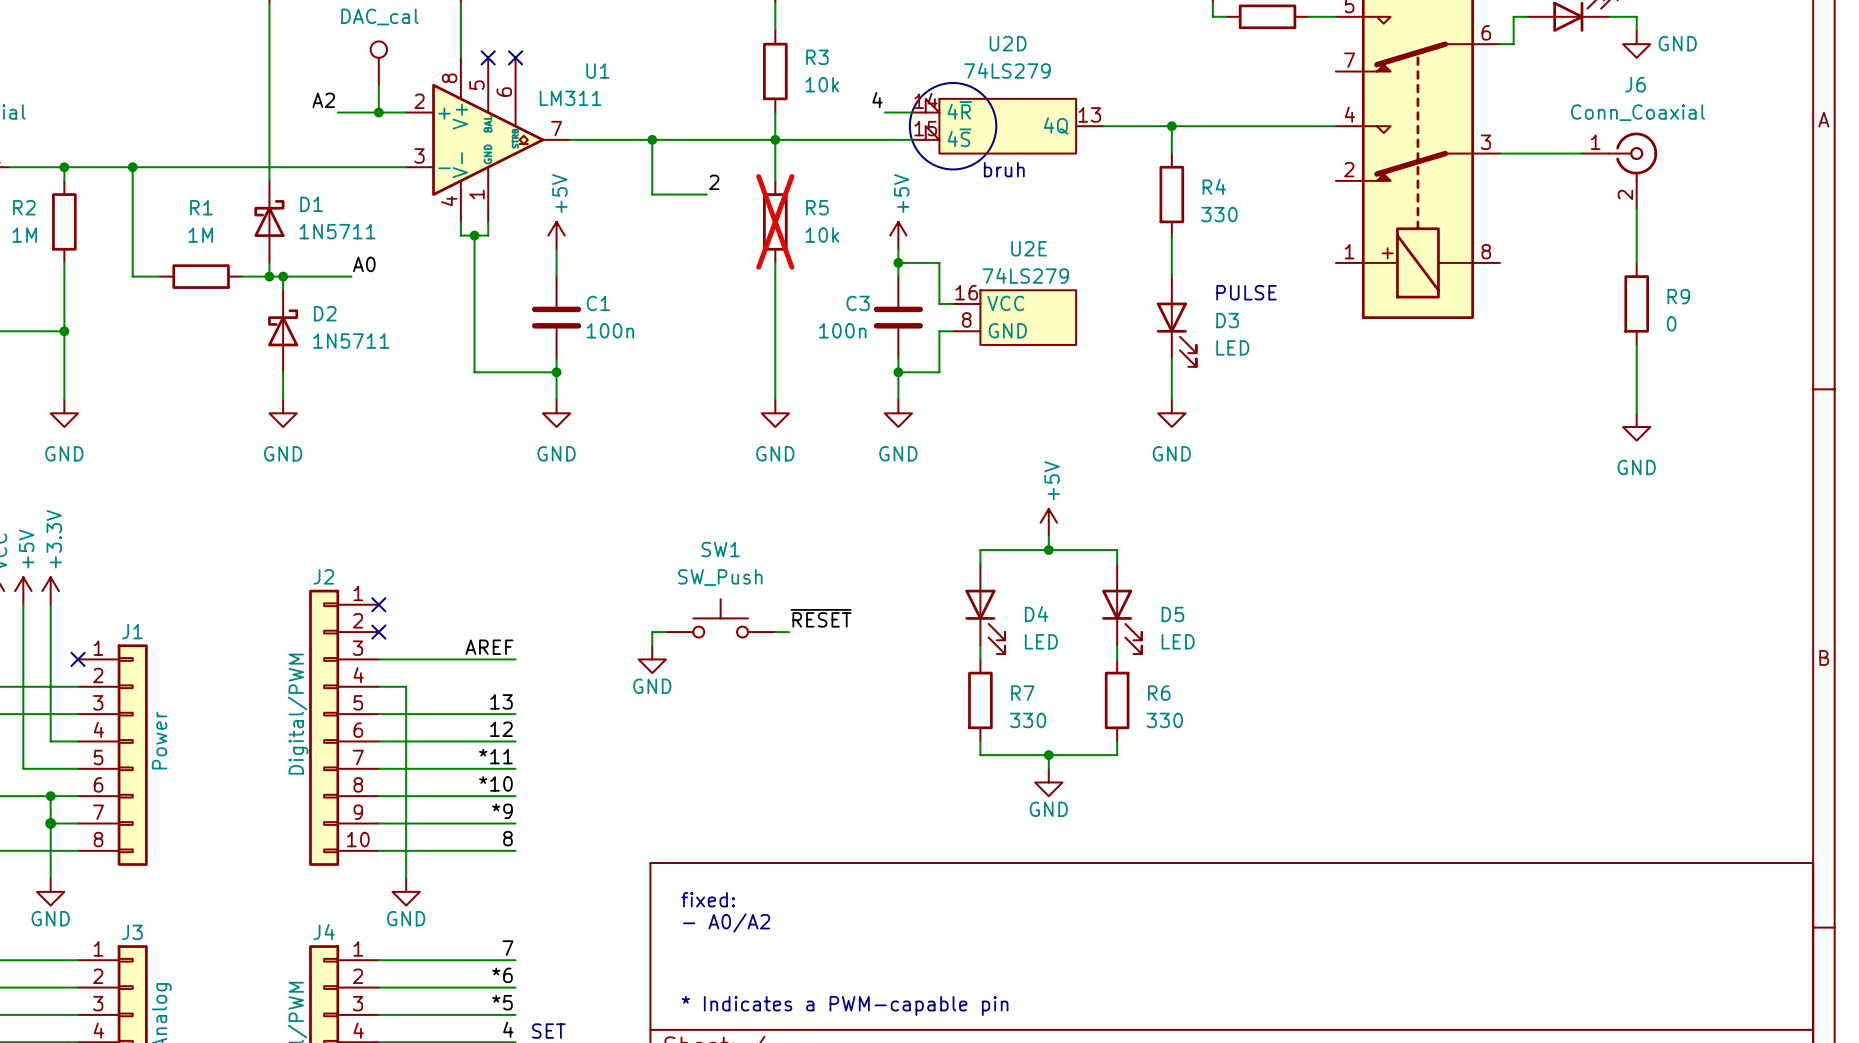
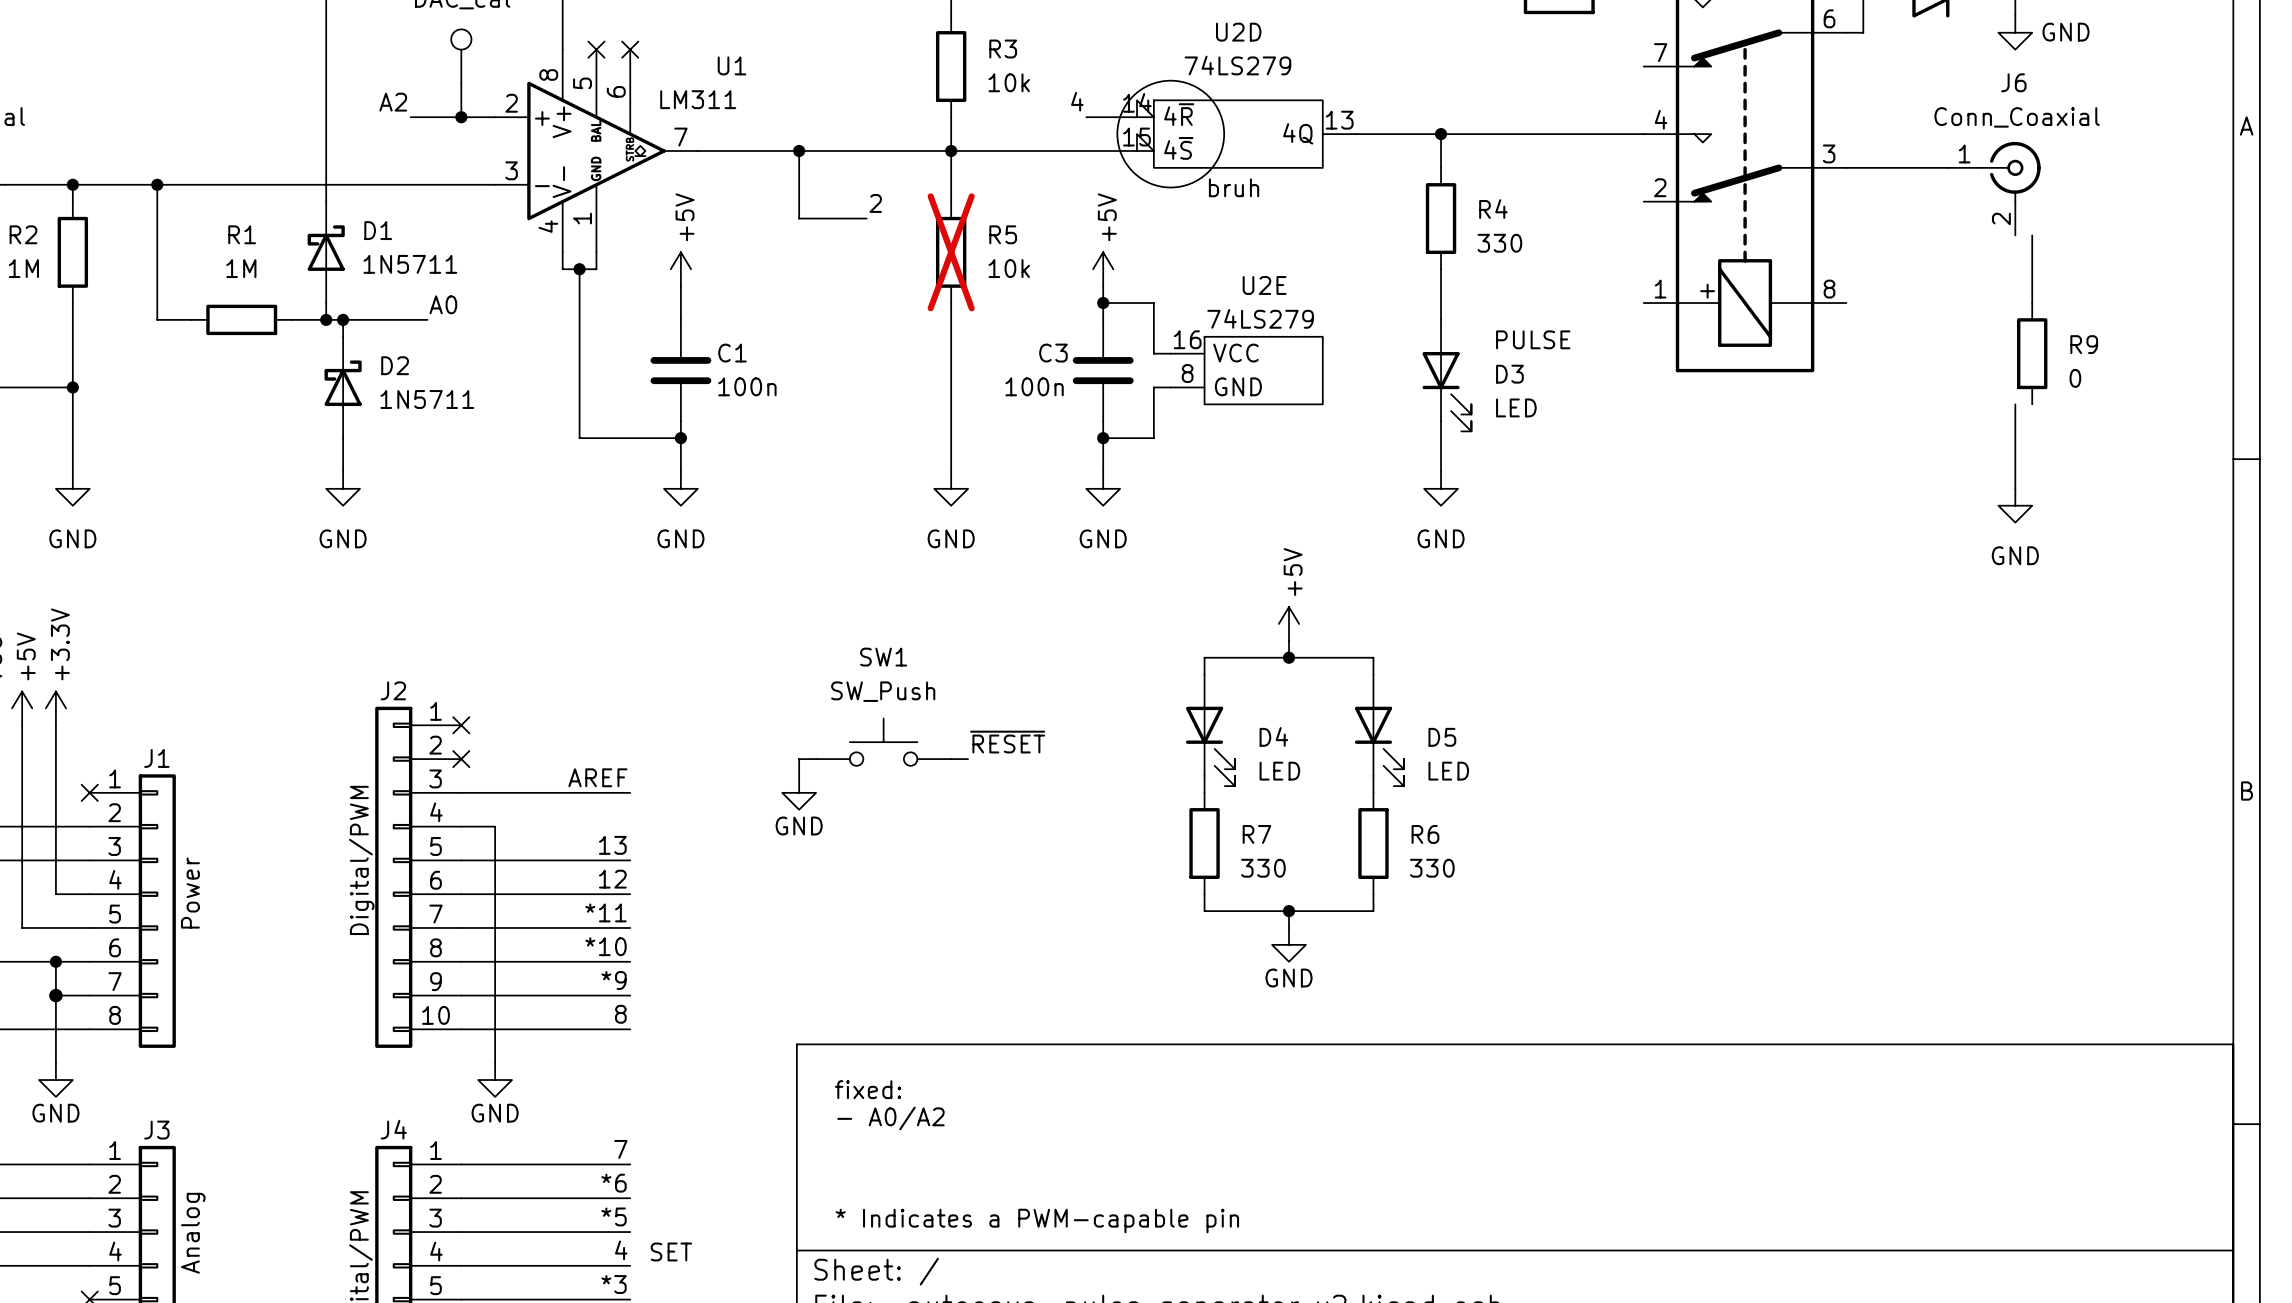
wire: (1636, 208) (1636, 262) -> (2032, 235) (2032, 303)
R9 position: (1636, 303) -> (2032, 353)

